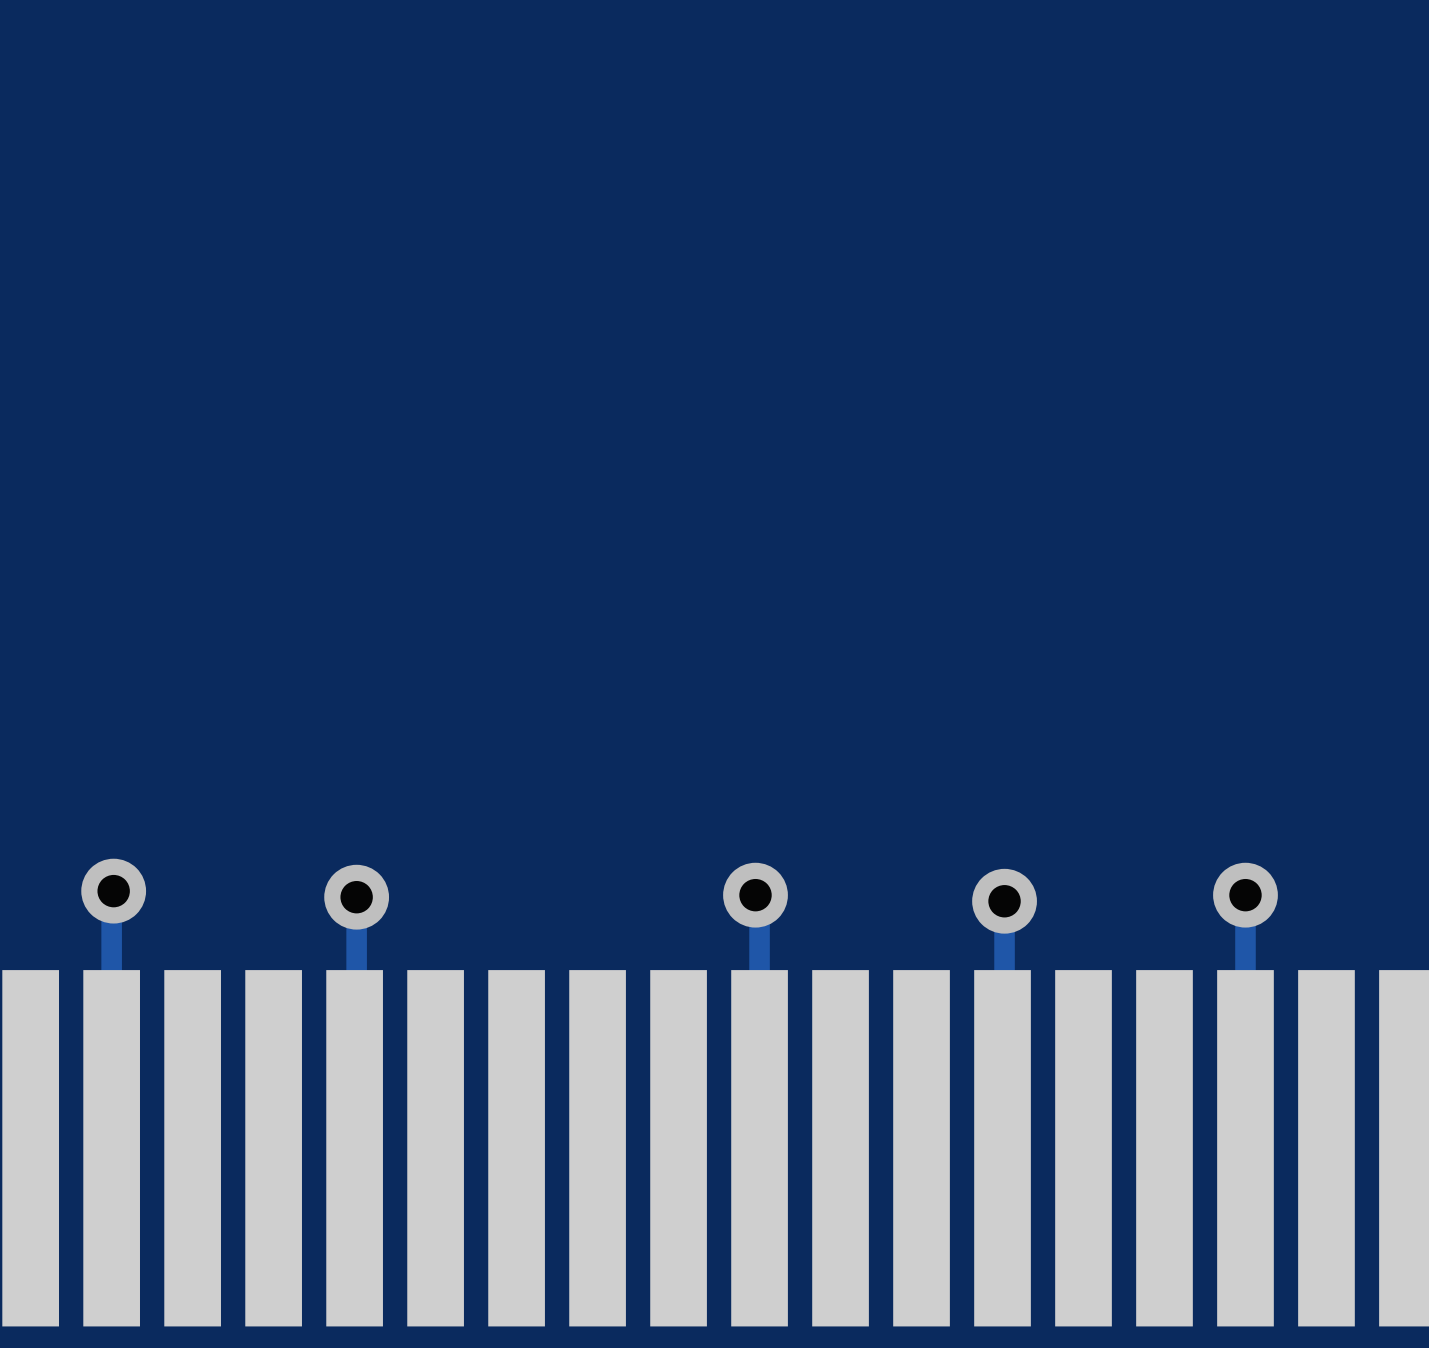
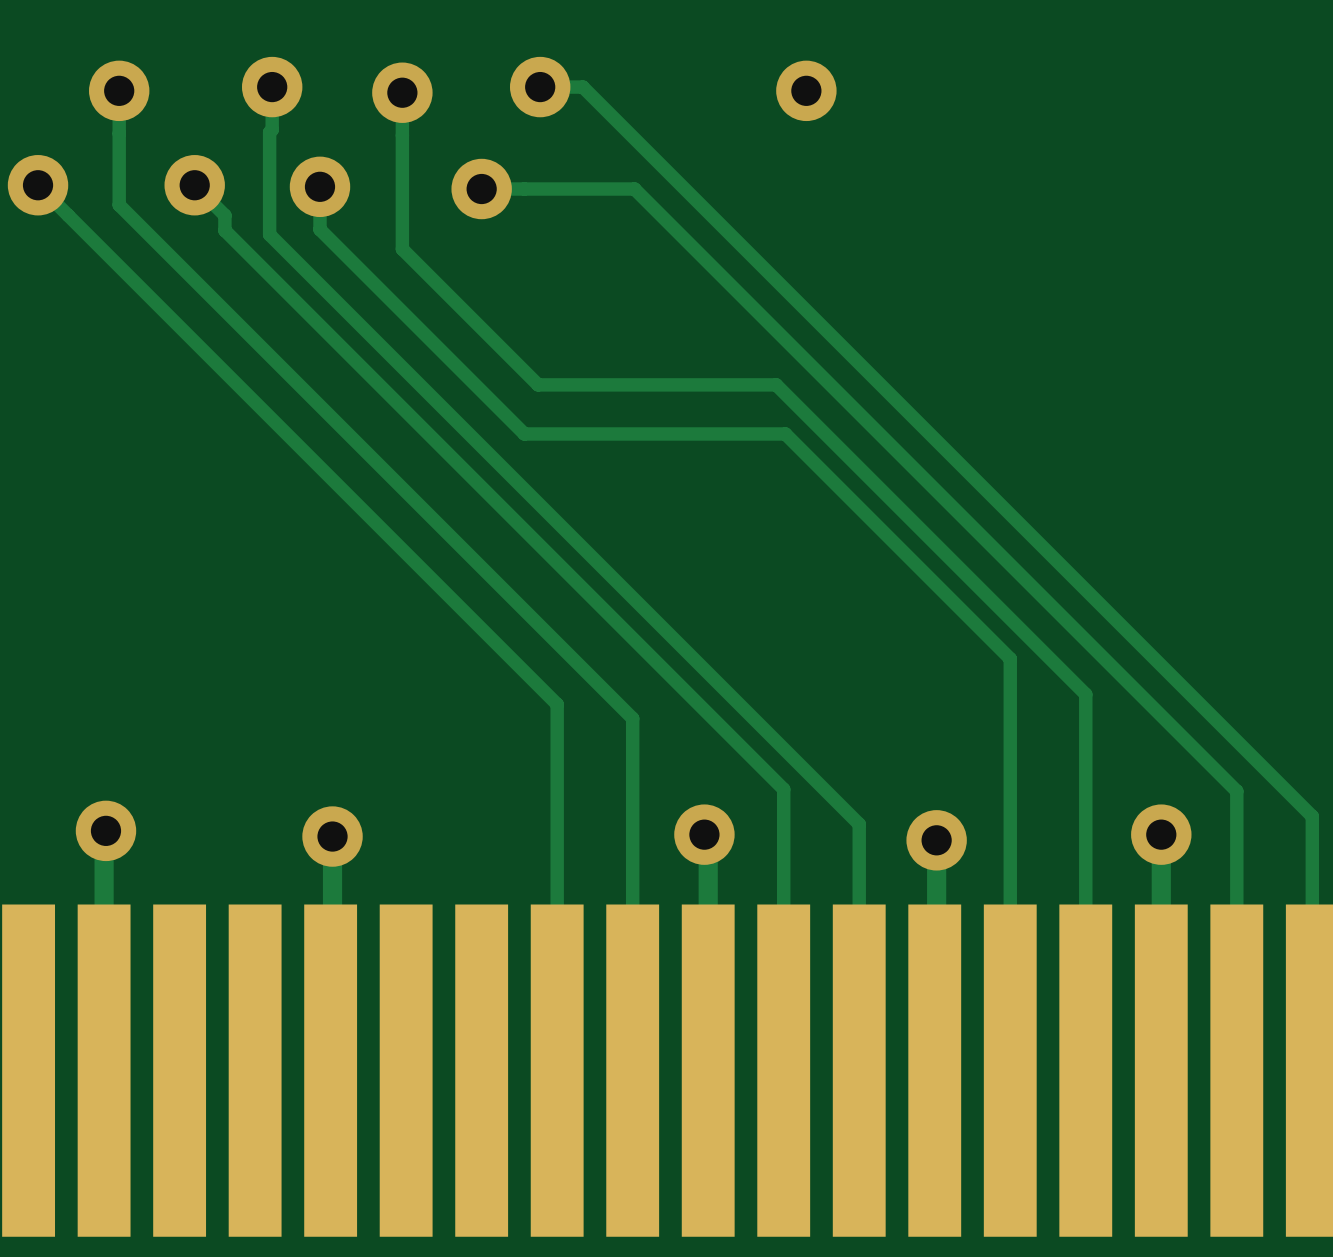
track: none -> (272, 87) (272, 129) (269, 132) (269, 234) (859, 824) (859, 1070)
via: none -> (272, 87)
track: none -> (540, 87) (582, 87) (1312, 816) (1312, 1070)
via: none -> (540, 87)
track: none -> (119, 90) (119, 205) (632, 718) (632, 1070)
via: none -> (119, 90)
via: none -> (806, 90)
track: none -> (402, 92) (402, 249) (538, 384) (776, 384) (1085, 694) (1085, 1070)
via: none -> (402, 92)
track: none -> (38, 185) (557, 704) (557, 1070)
via: none -> (38, 185)
track: none -> (194, 185) (224, 215) (224, 230) (783, 789) (783, 1070)
via: none -> (194, 185)
track: none -> (319, 186) (319, 229) (524, 433) (785, 433) (1010, 658) (1010, 1070)
via: none -> (319, 186)
track: none -> (481, 189) (634, 189) (1236, 791) (1236, 1070)
via: none -> (481, 189)

